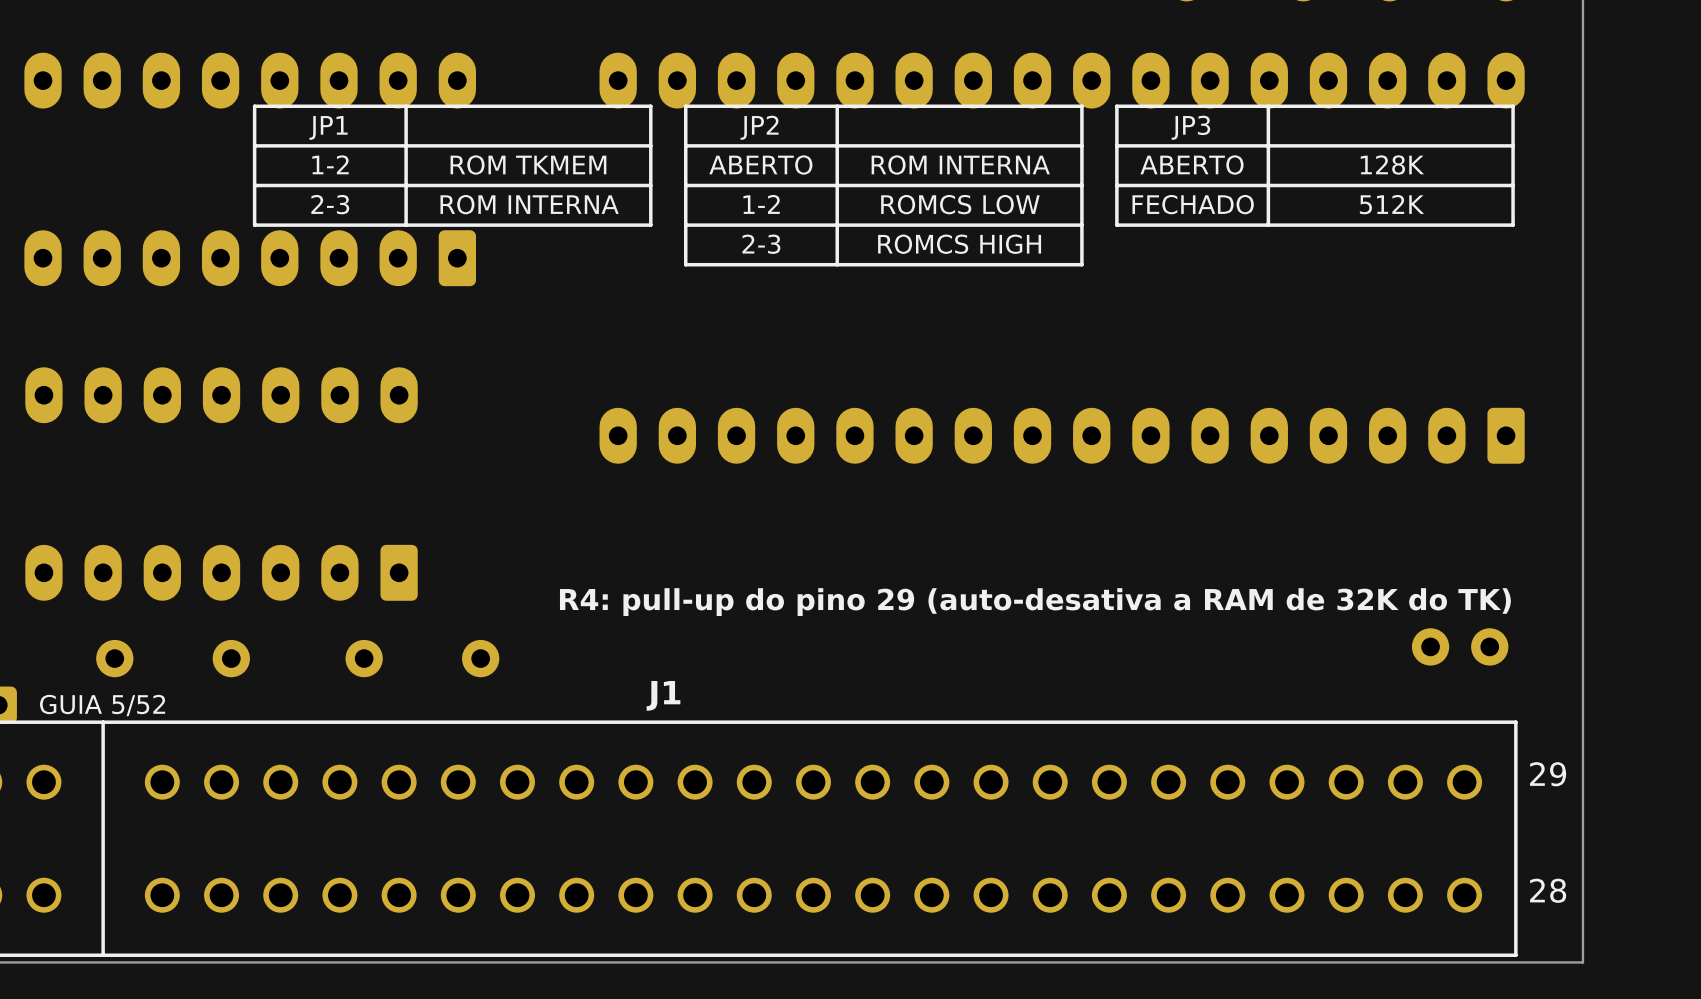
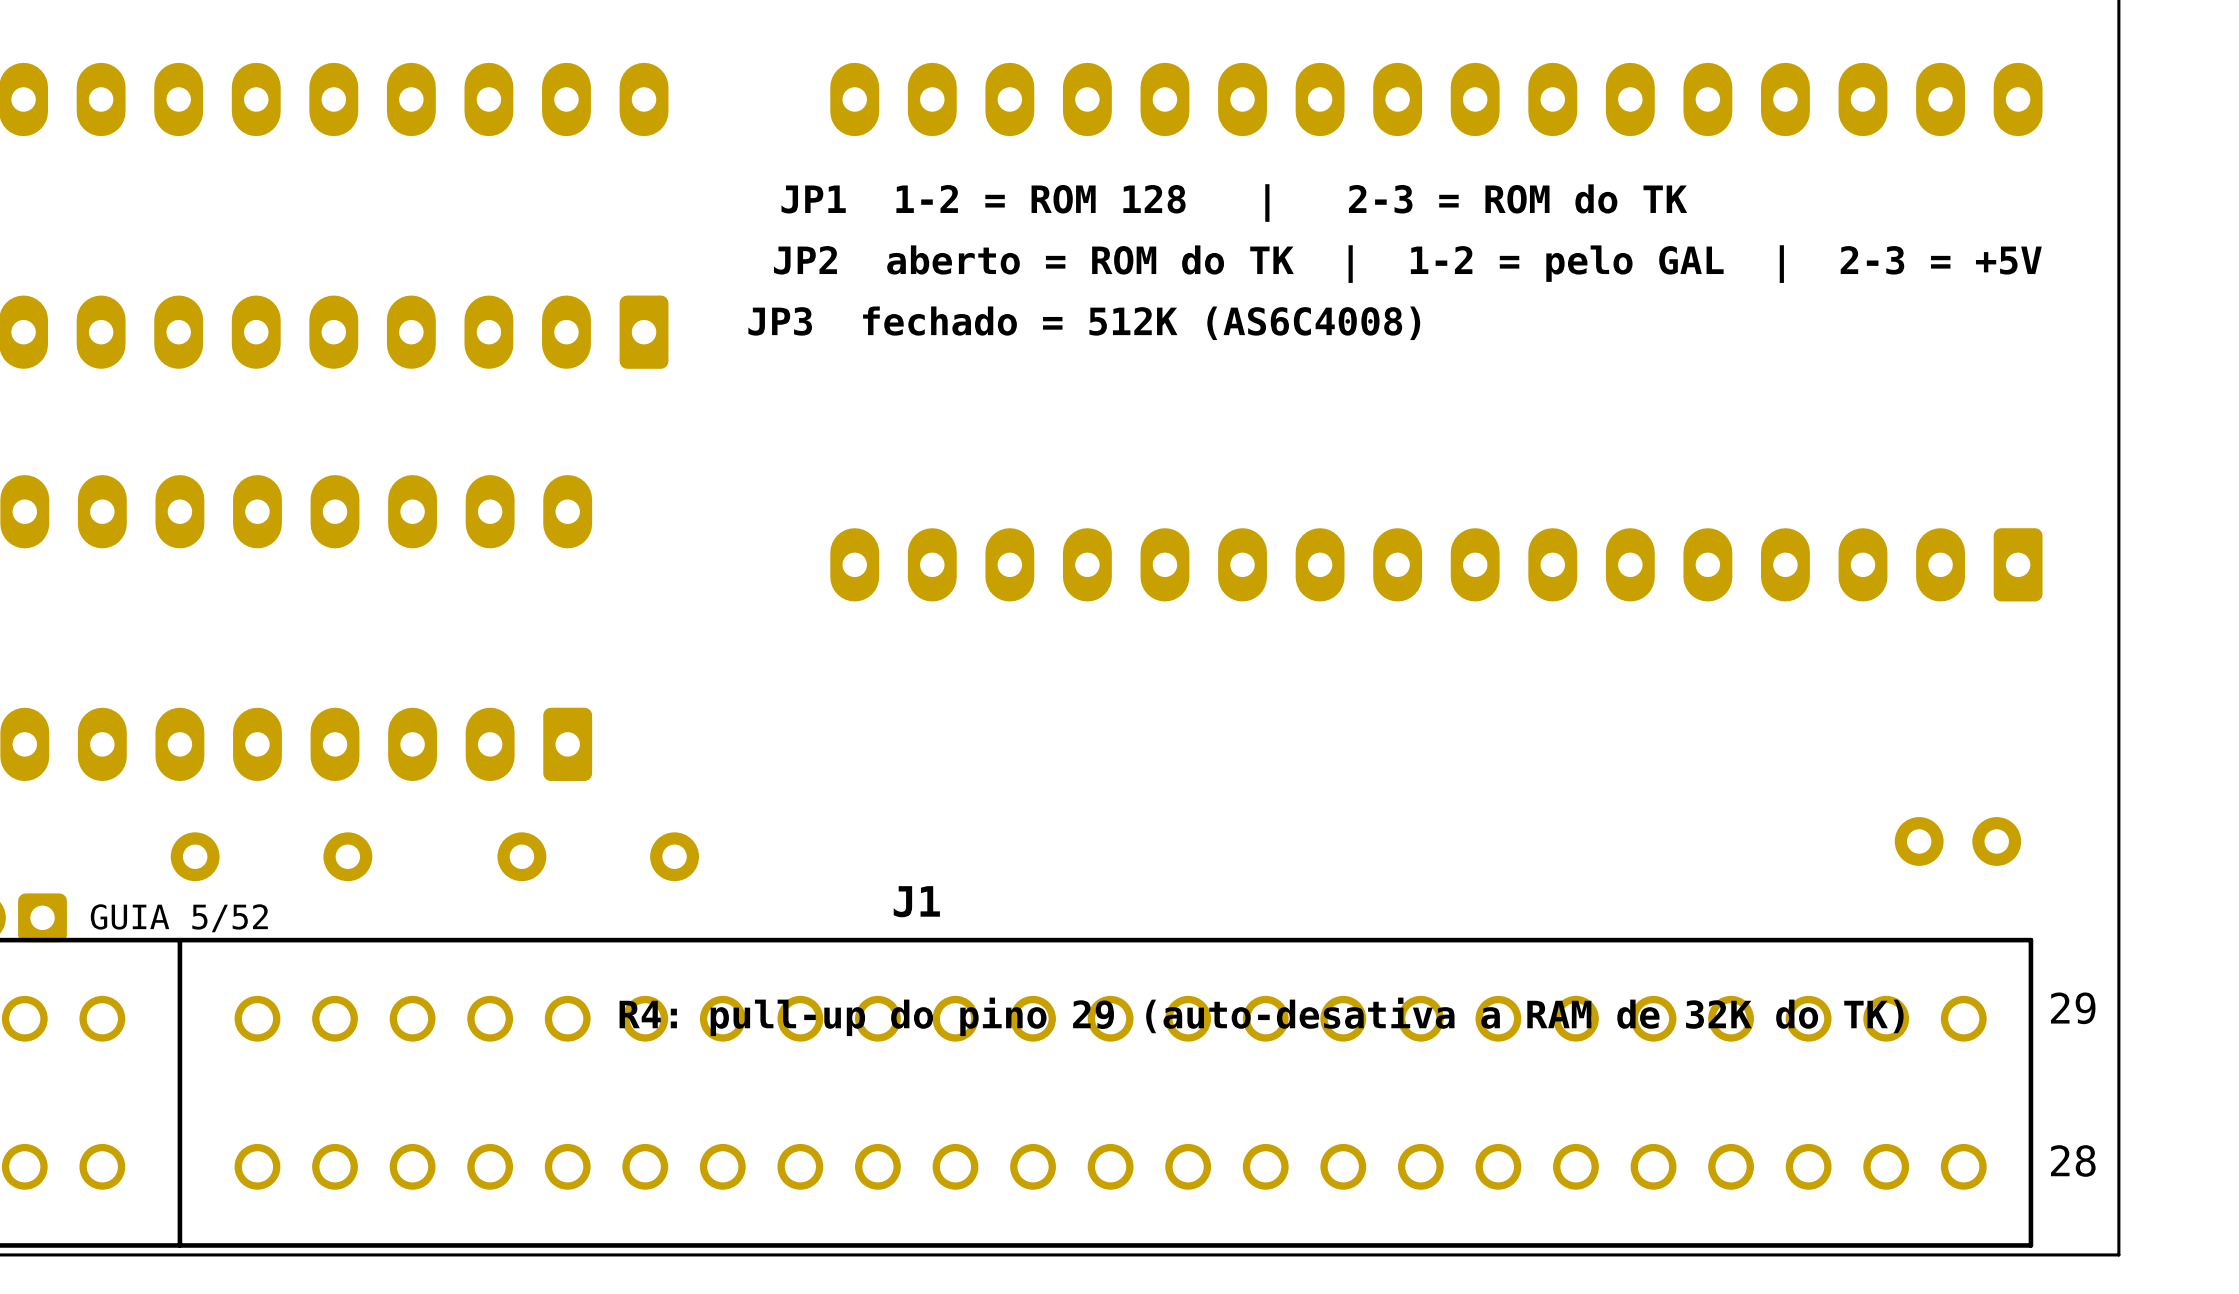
line: (406, 106) (406, 225) -> none
line: (650, 106) (254, 106) (254, 225) (650, 225) (650, 106) -> none
line: (837, 106) (837, 264) -> none
line: (1081, 106) (685, 106) (685, 264) (1081, 264) (1081, 106) -> none
line: (1268, 106) (1268, 225) -> none
line: (1513, 106) (1513, 225) (1116, 225) (1116, 106) (1513, 106) -> none
text: JP1 (328, 127) -> none
text: JP2 (759, 127) -> none
text: JP3 (1190, 127) -> none
line: (650, 145) (254, 145) -> none
line: (1081, 145) (685, 145) -> none
line: (1513, 145) (1116, 145) -> none
text: none -> JP1 1-2 = ROM 128 | 2-3 = ROM do TK (1234, 203)
text: 1-2 (330, 164) -> none
text: ROM TKMEM (528, 165) -> none
text: ABERTO (760, 165) -> none
text: ROM INTERNA (960, 165) -> none
text: ABERTO (1192, 165) -> none
text: 128K (1392, 165) -> none
line: (650, 185) (254, 185) -> none
line: (1081, 185) (685, 185) -> none
line: (1513, 185) (1116, 185) -> none
text: 2-3 (330, 204) -> none
text: ROM INTERNA (529, 204) -> none
text: 1-2 (761, 204) -> none
text: ROMCS LOW (960, 204) -> none
text: FECHADO (1193, 204) -> none
text: 512K (1391, 204) -> none
text: none -> JP2 aberto = ROM do TK | 1-2 = pelo GAL | 2-3 = +5V (1407, 264)
line: (1081, 225) (685, 225) -> none
text: 2-3 (761, 244) -> none
text: ROMCS HIGH (959, 244) -> none
text: none -> JP3 fechado = 512K (AS6C4008) (1084, 323)
text position: R4: pull-up do pino 29 (auto-desativa a RAM de 32K do TK) (1035, 602) -> R4: pull-up do pino 29 (auto-desativa a RAM de 32K do TK) (1261, 1016)

